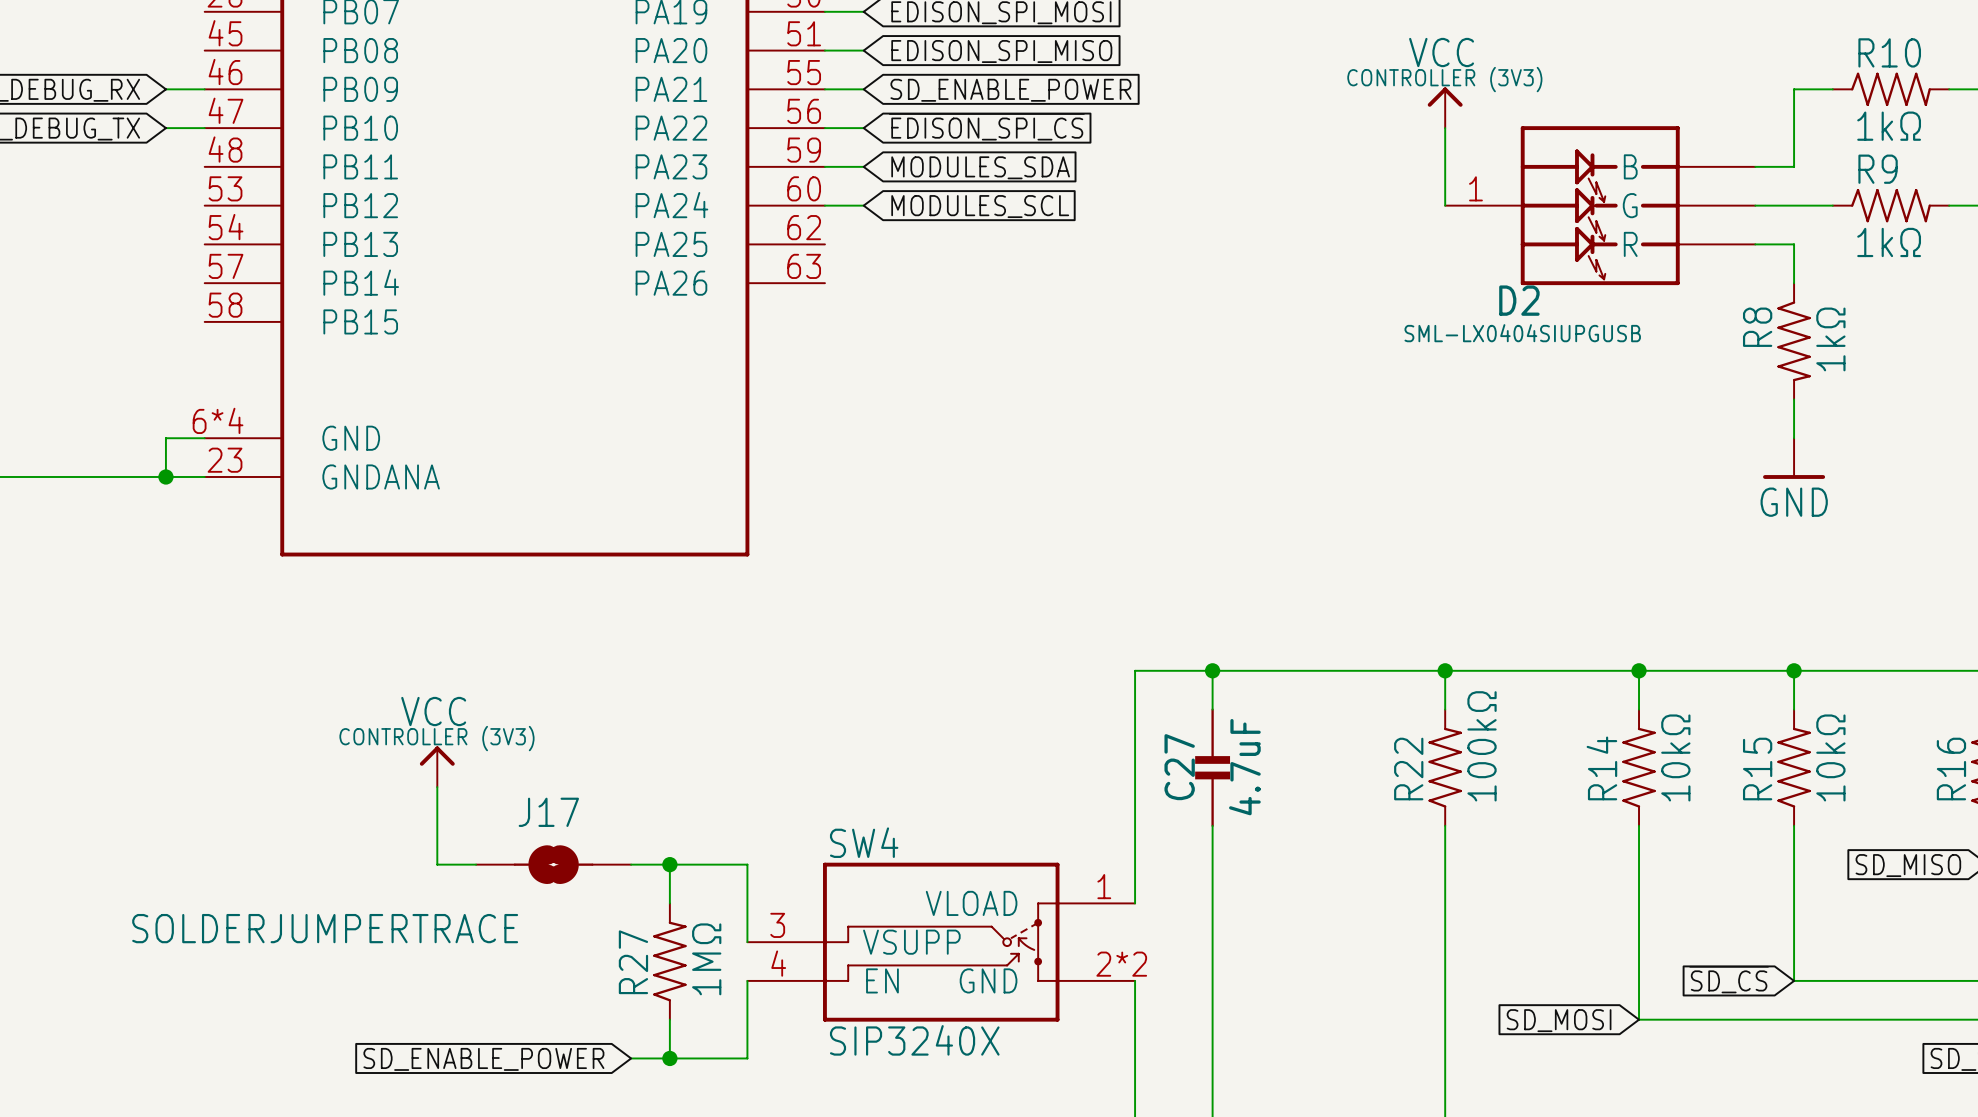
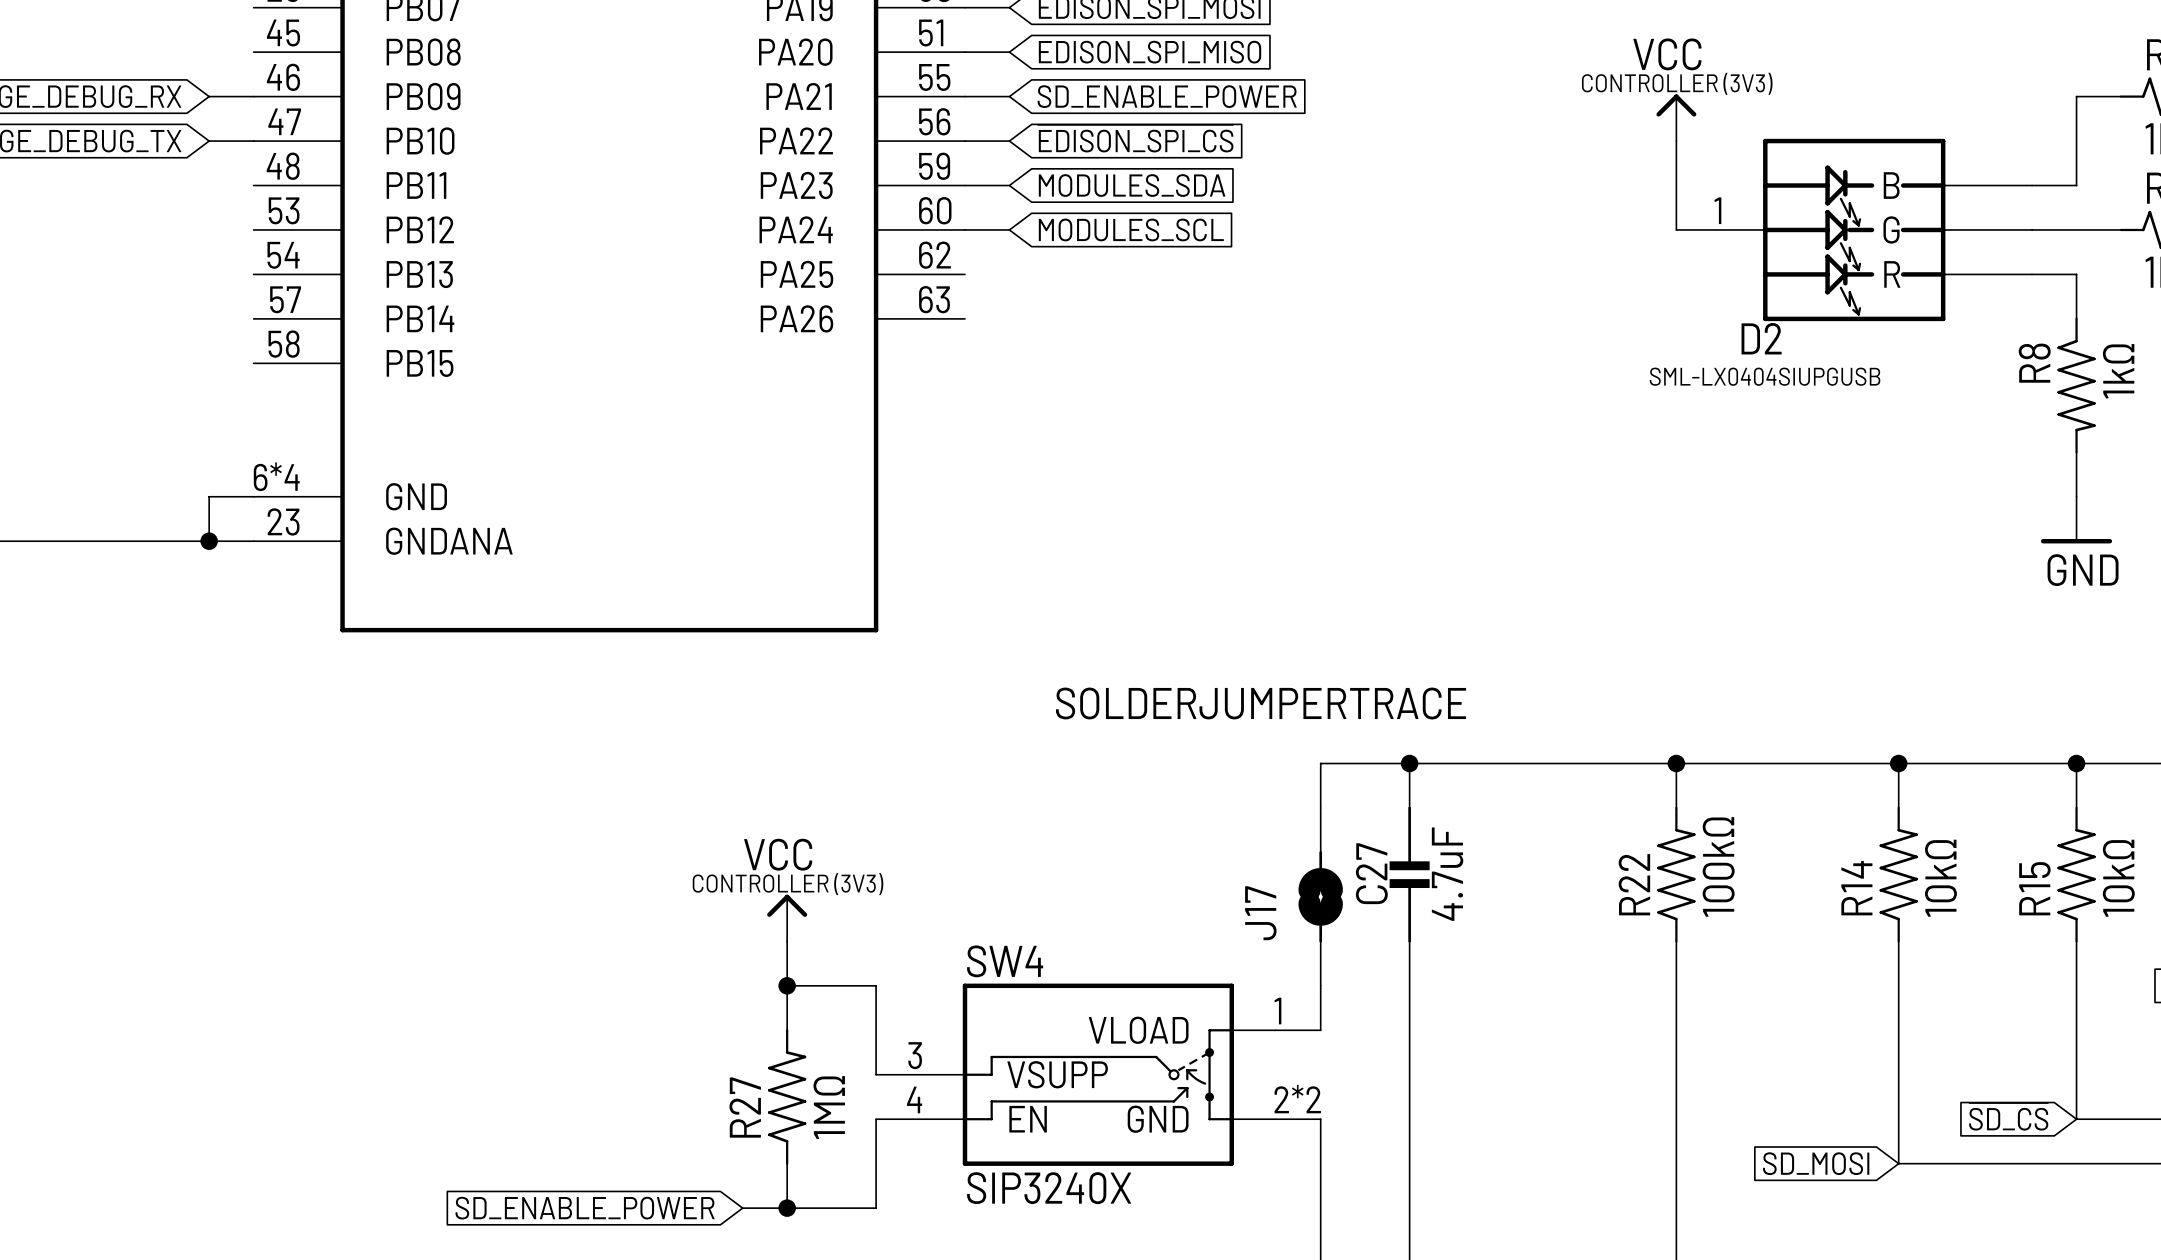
power symbol position: (437, 766) -> (787, 918)
wire: (437, 787) (437, 864) (476, 864) -> none
J17 name position: J17 (548, 812) -> J17 (1260, 913)
J17 rotation: 0° (553, 864) -> 90° clockwise (1320, 896)
J17 position: (553, 864) -> (1320, 896)
wire: (631, 864) (669, 864) -> (787, 941) (787, 985)
J17 value position: SOLDERJUMPERTRACE (325, 928) -> SOLDERJUMPERTRACE (1261, 703)

